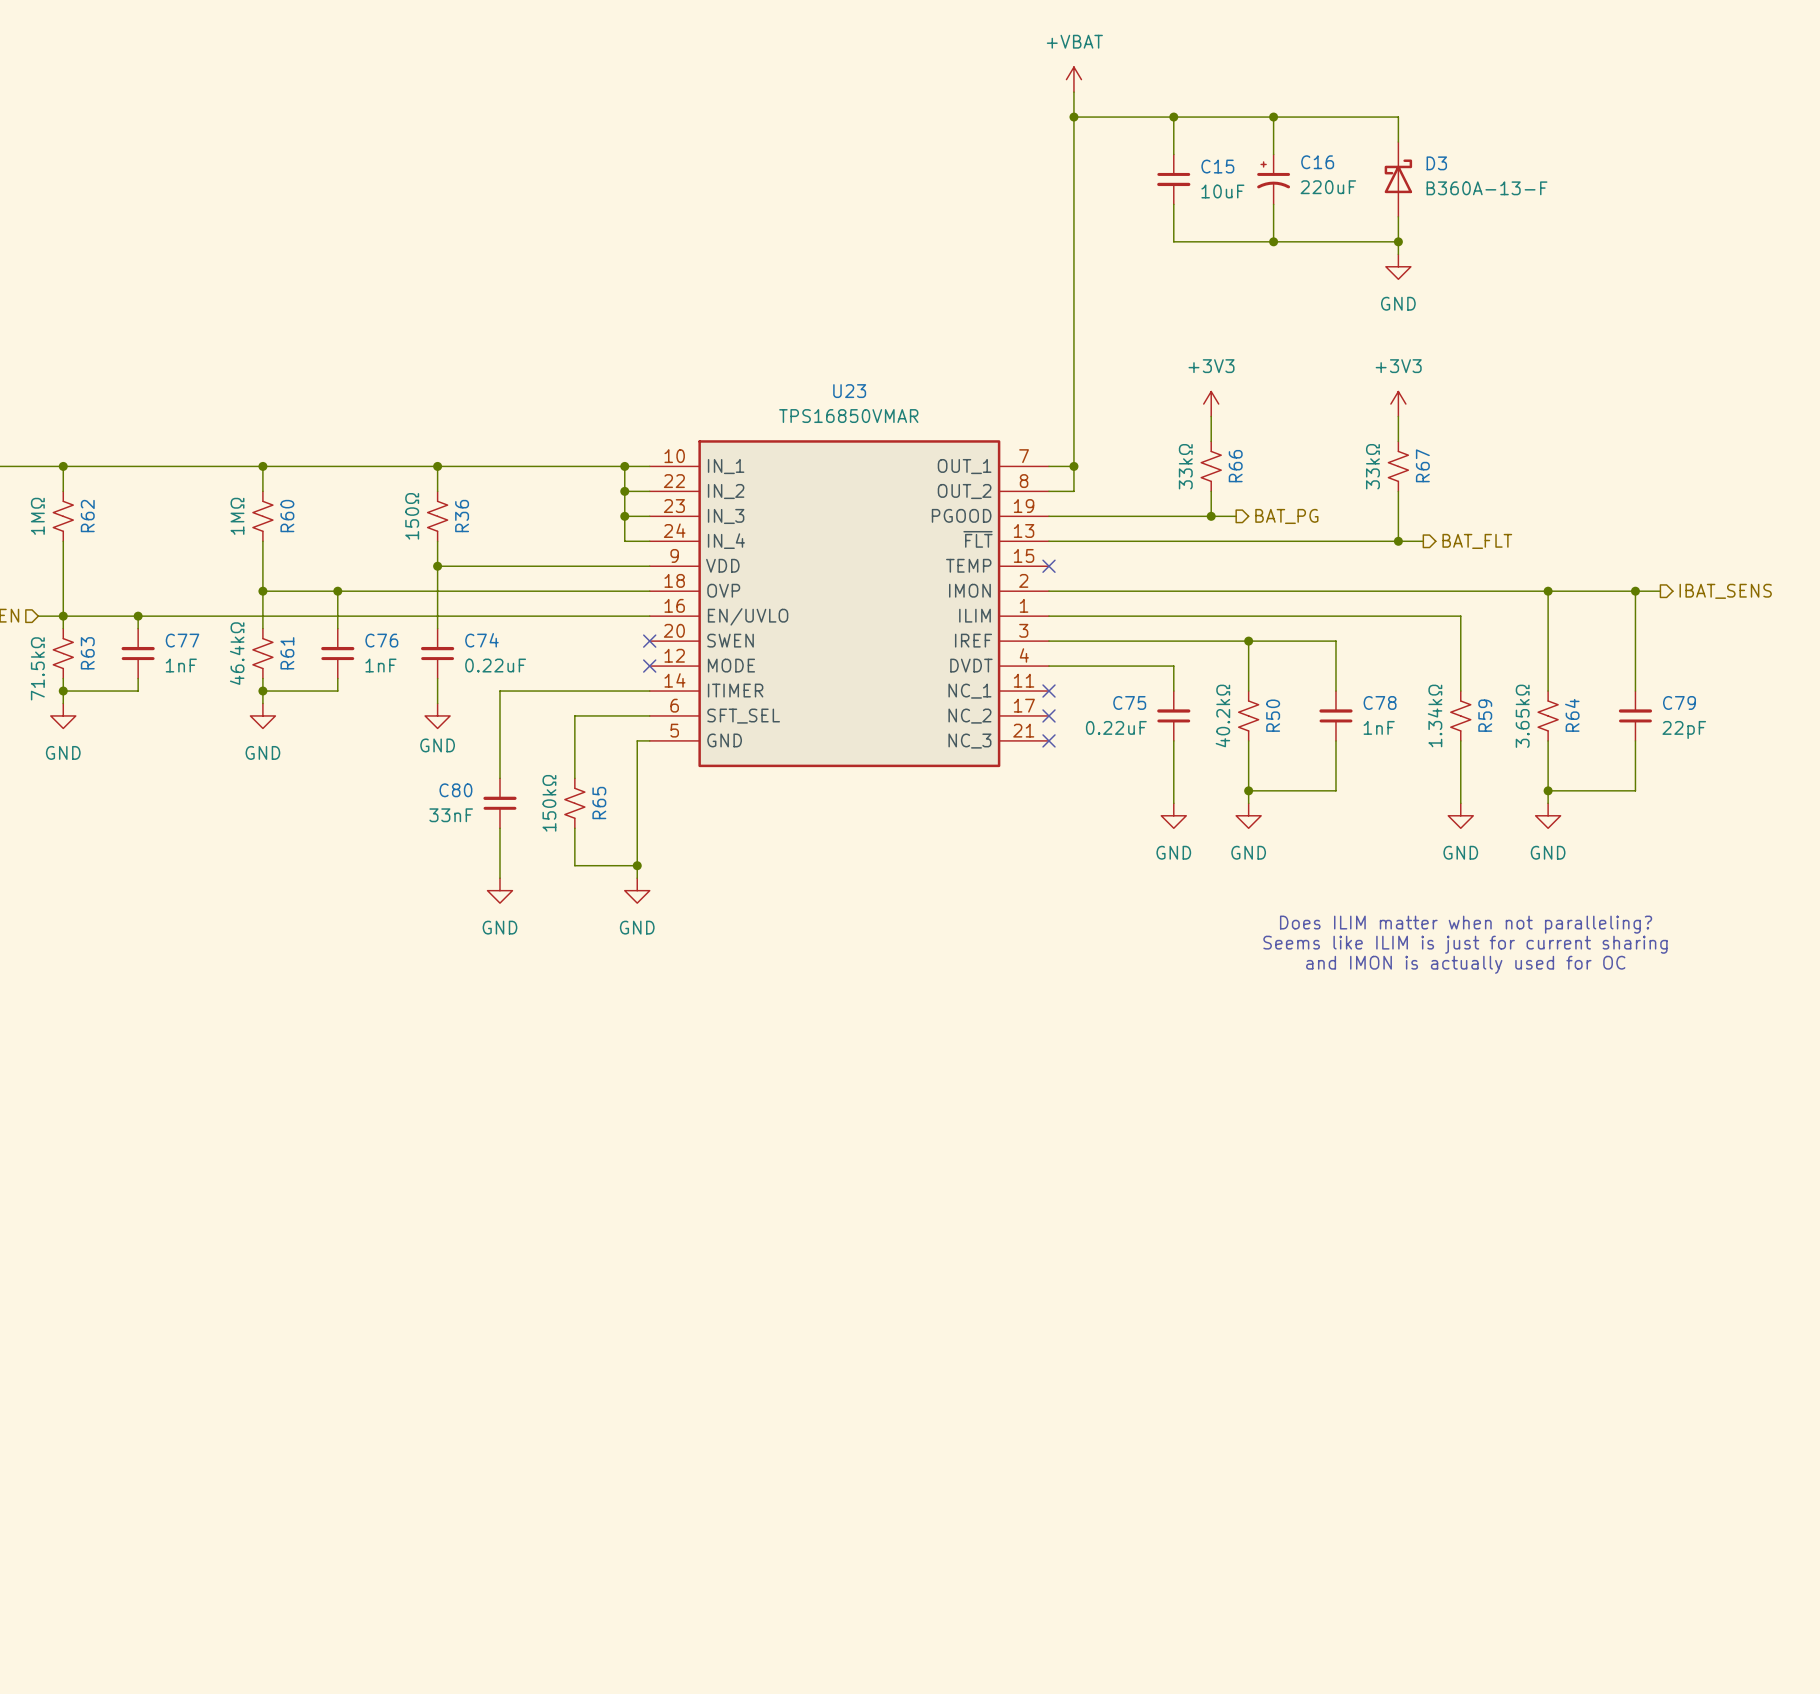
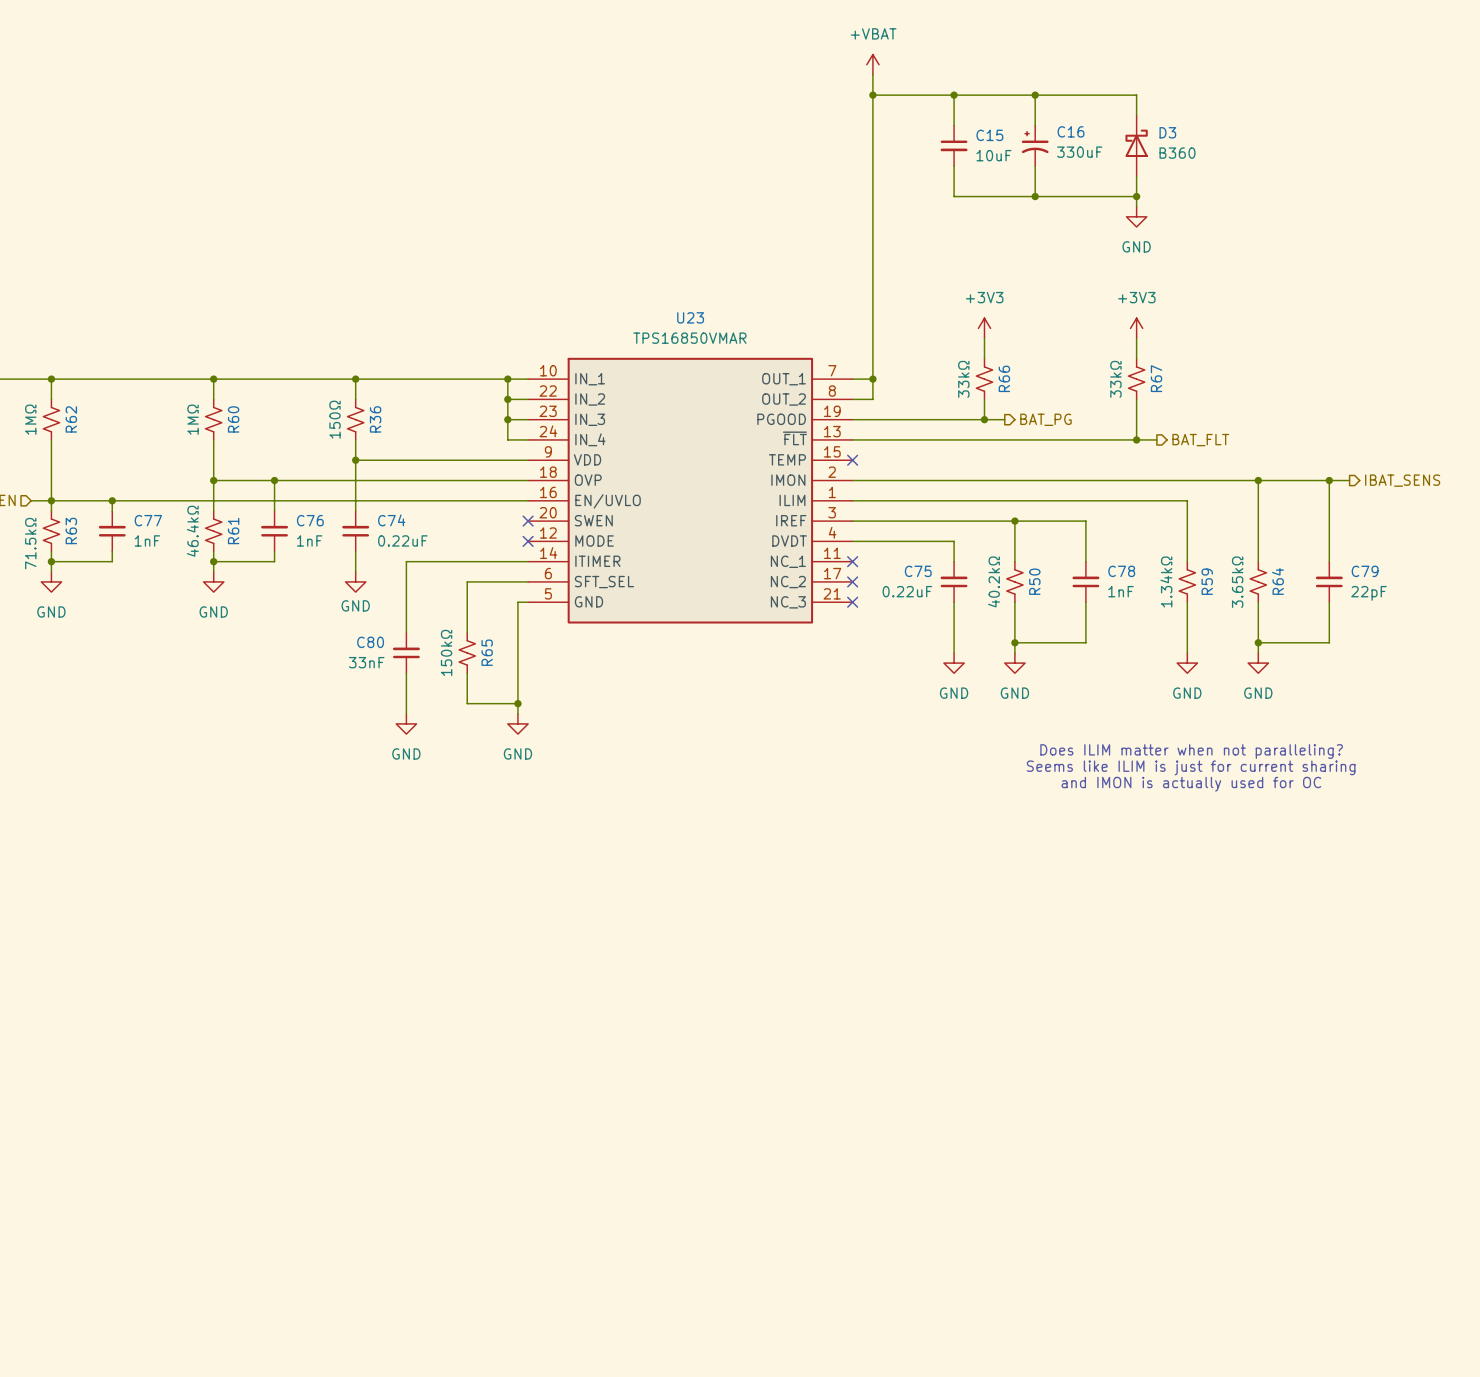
C16 value: 220uF (1328, 187) -> 330uF (1079, 152)
D3 value: B360A-13-F (1487, 188) -> B360 (1177, 153)

